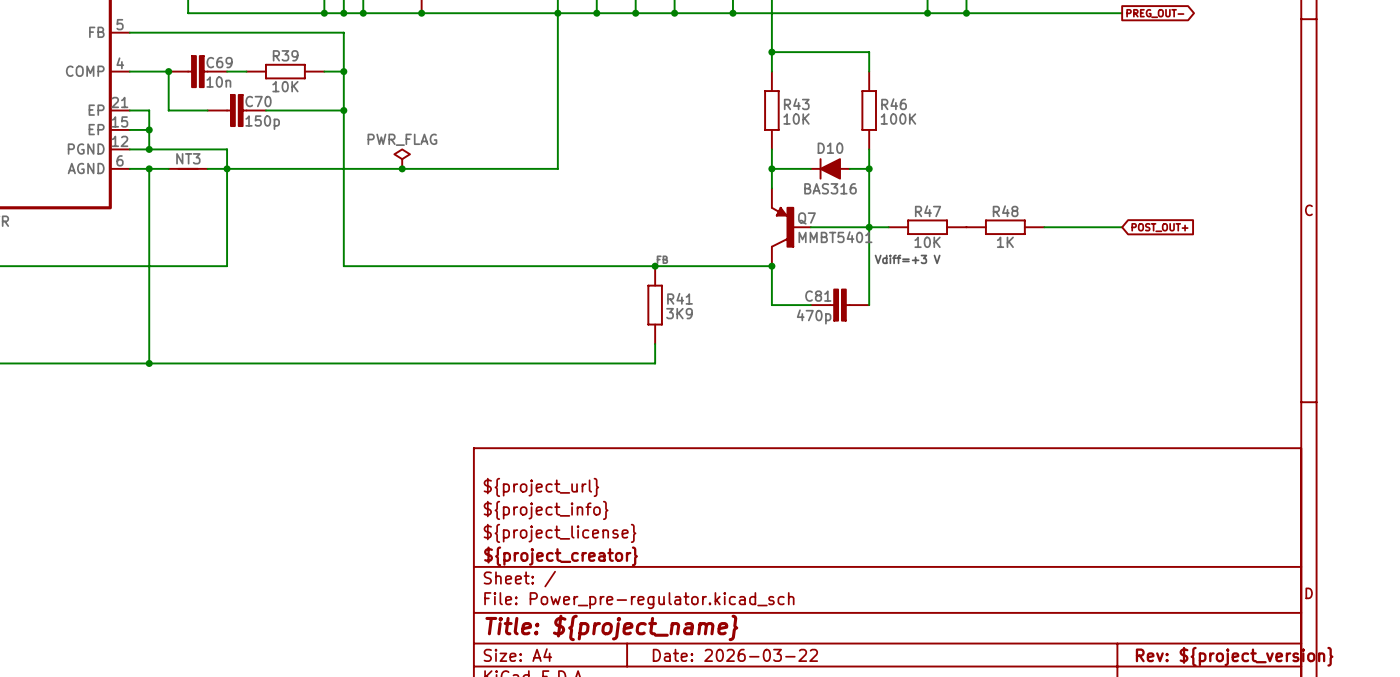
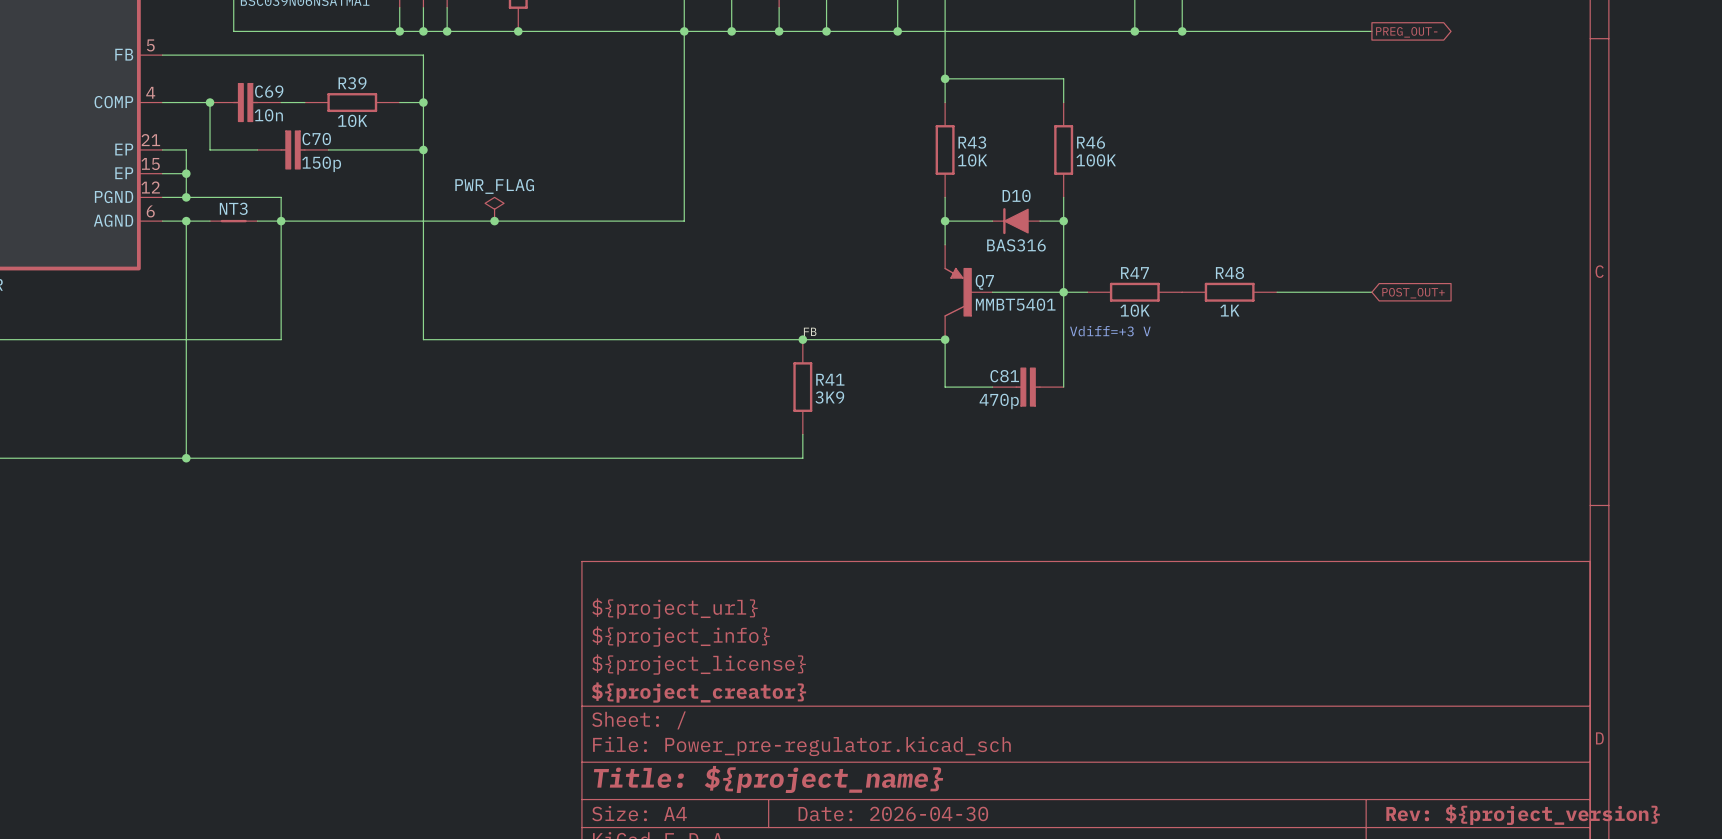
title block: Date: 2026-03-22 (735, 655) -> Date: 2026-04-30 (893, 813)

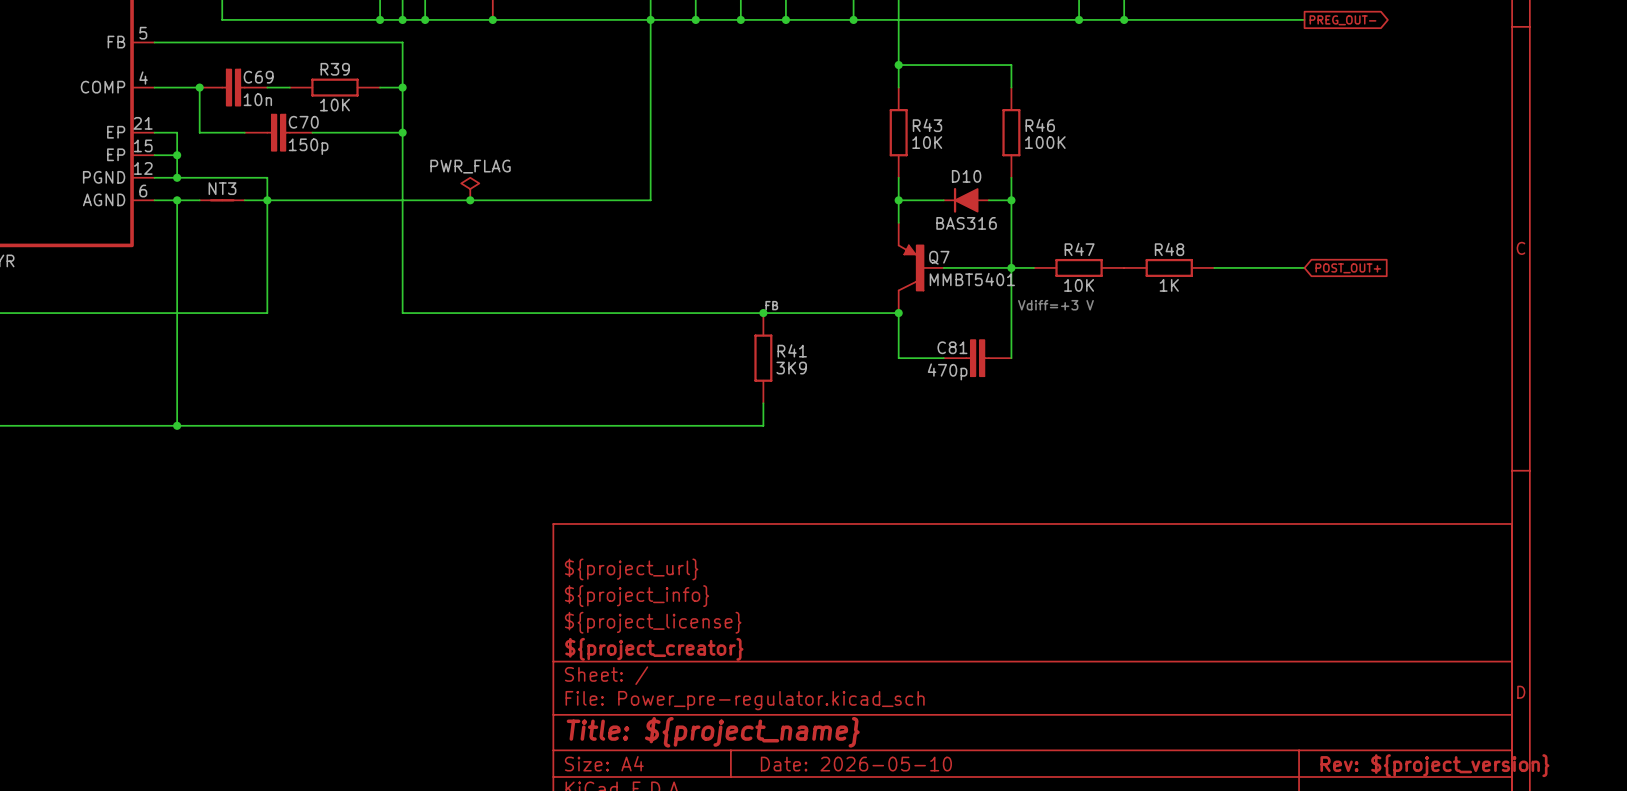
title block: Date: 2026-04-30 (893, 813) -> Date: 2026-05-10 (856, 764)

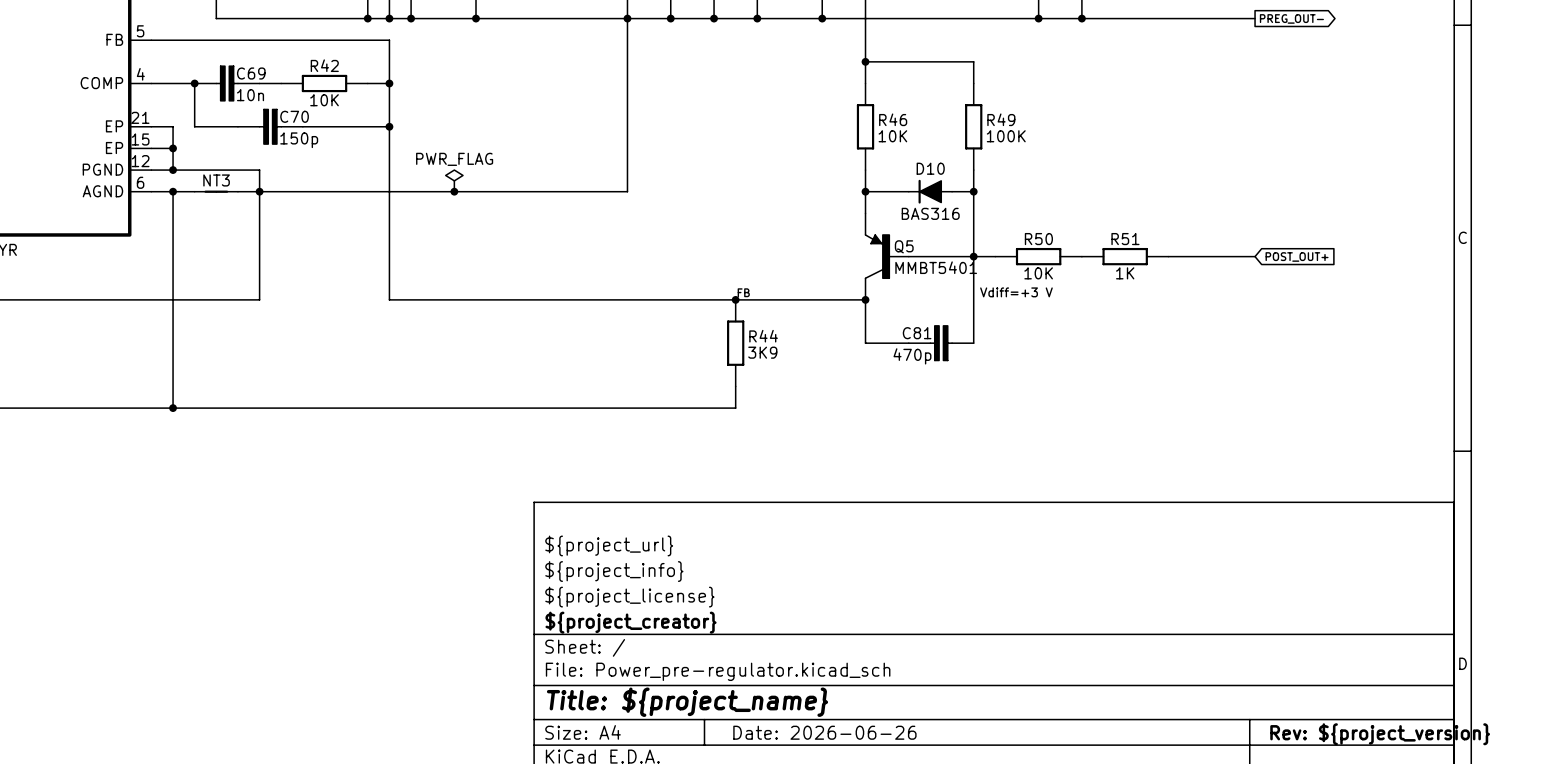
R39 name: R39 (335, 69) -> R42 (324, 65)
R43 name: R43 (927, 125) -> R46 (893, 119)
R46 name: R46 (1040, 125) -> R49 (1001, 119)
R47 name: R47 (1079, 249) -> R50 (1038, 239)
R48 name: R48 (1169, 249) -> R51 (1125, 239)
Q7 name: Q7 (939, 257) -> Q5 (904, 246)
R41 name: R41 (792, 350) -> R44 (763, 336)
title block: Date: 2026-05-10 (856, 764) -> Date: 2026-06-26 (824, 732)

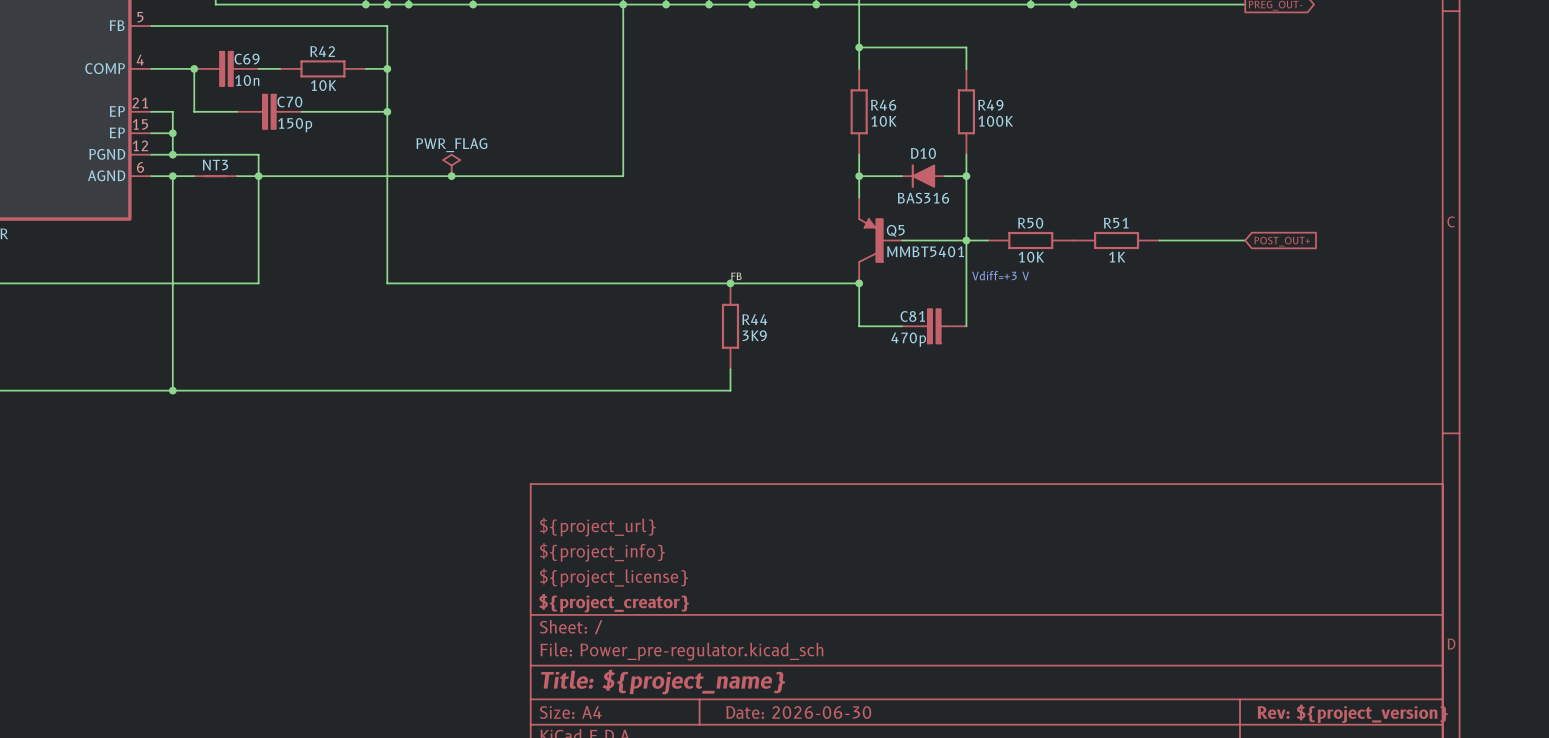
title block: Date: 2026-06-26 (824, 732) -> Date: 2026-06-30 (798, 712)

